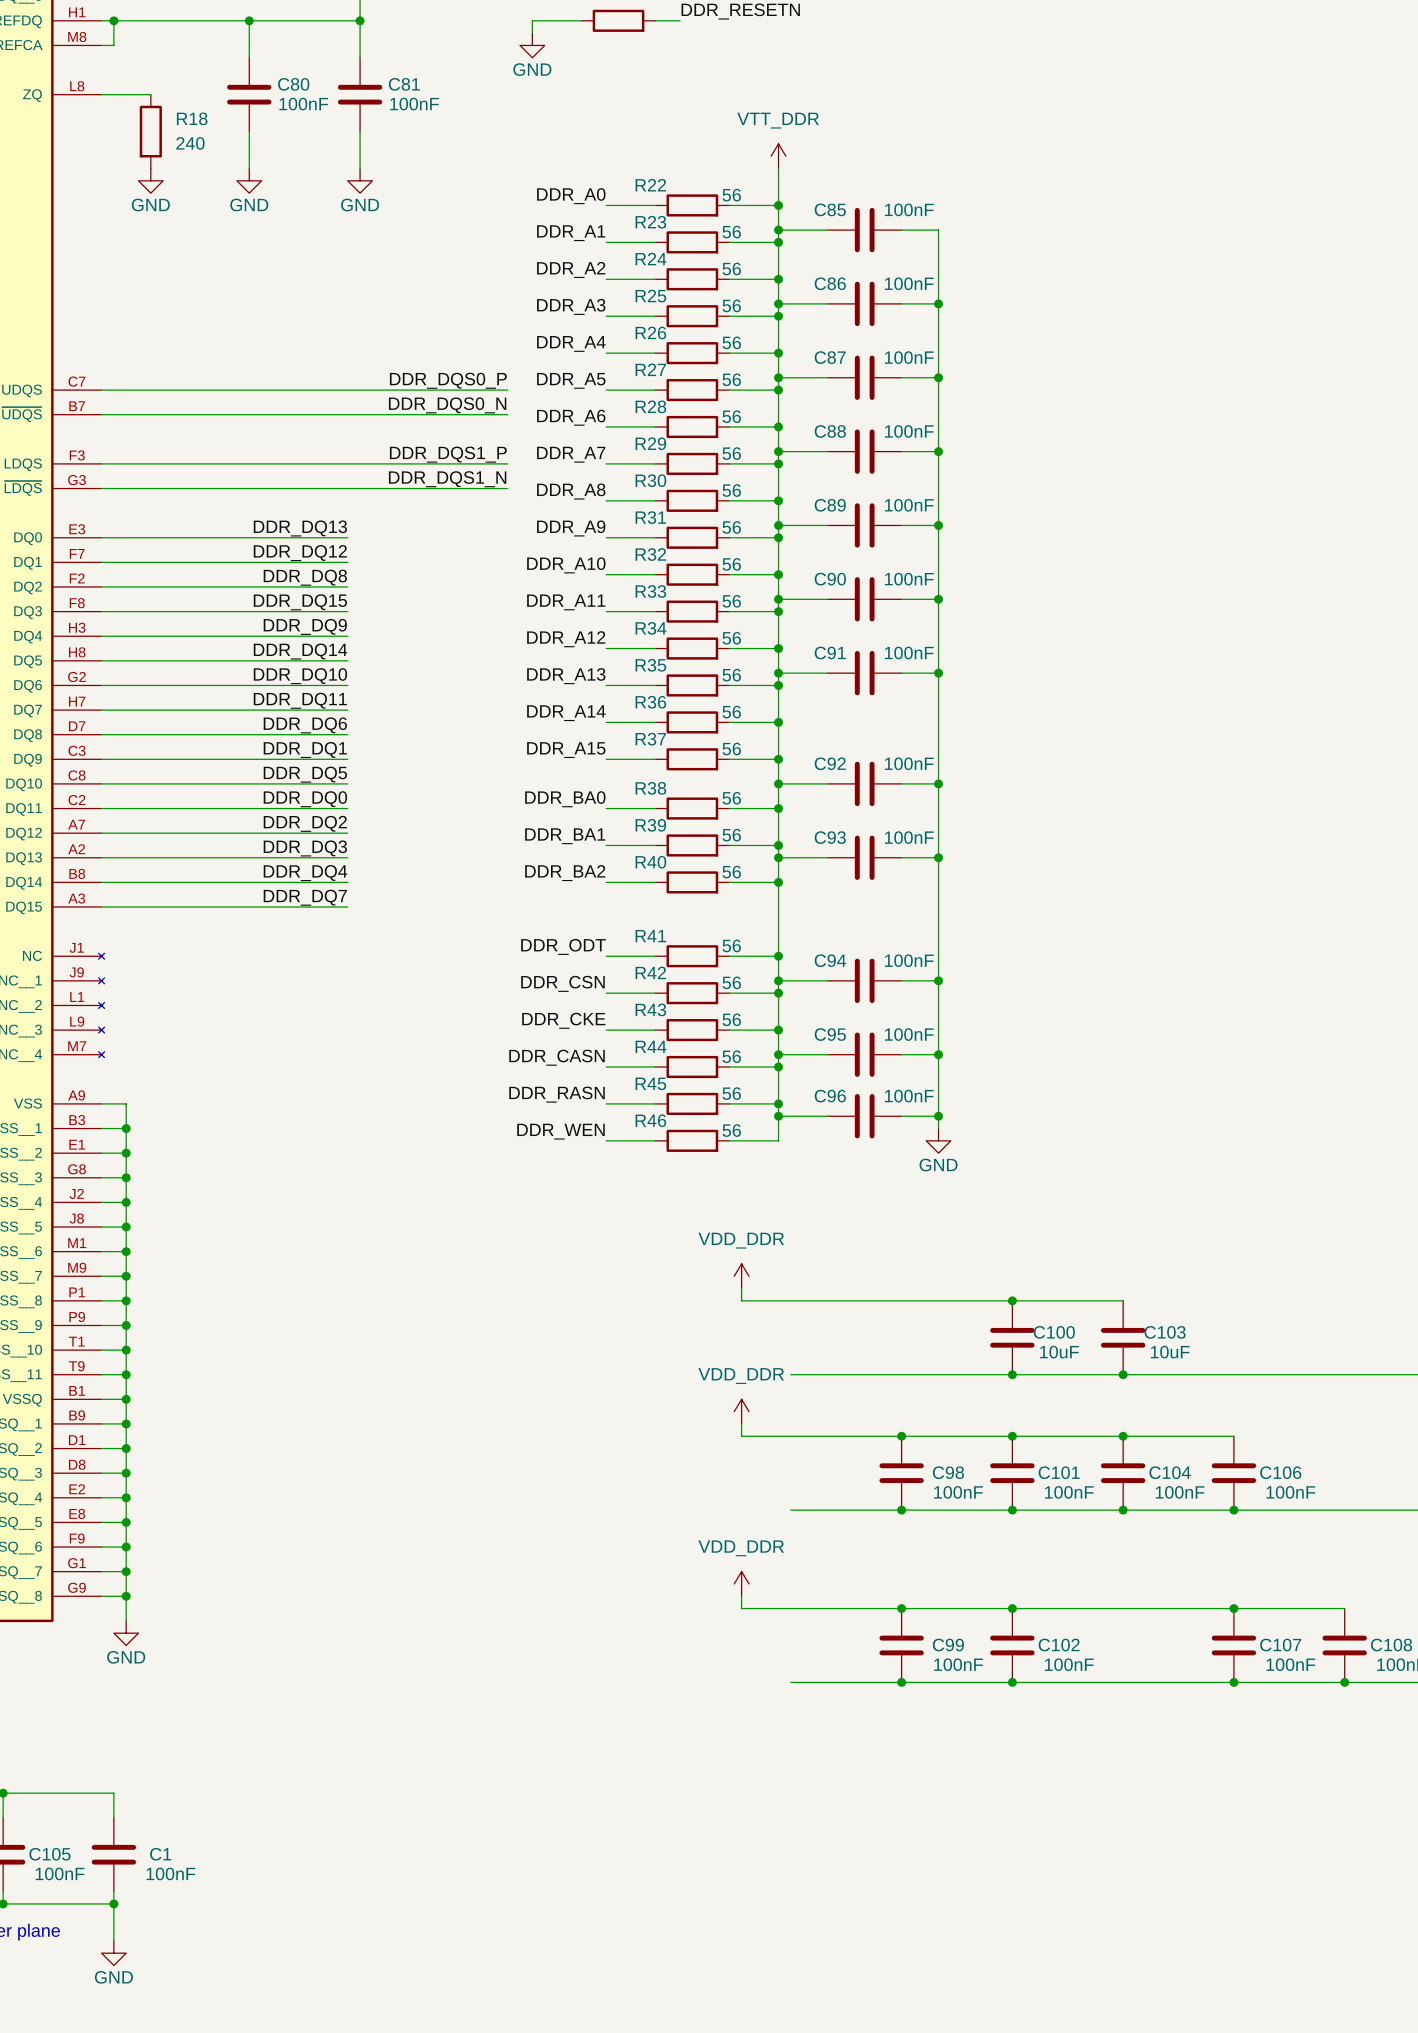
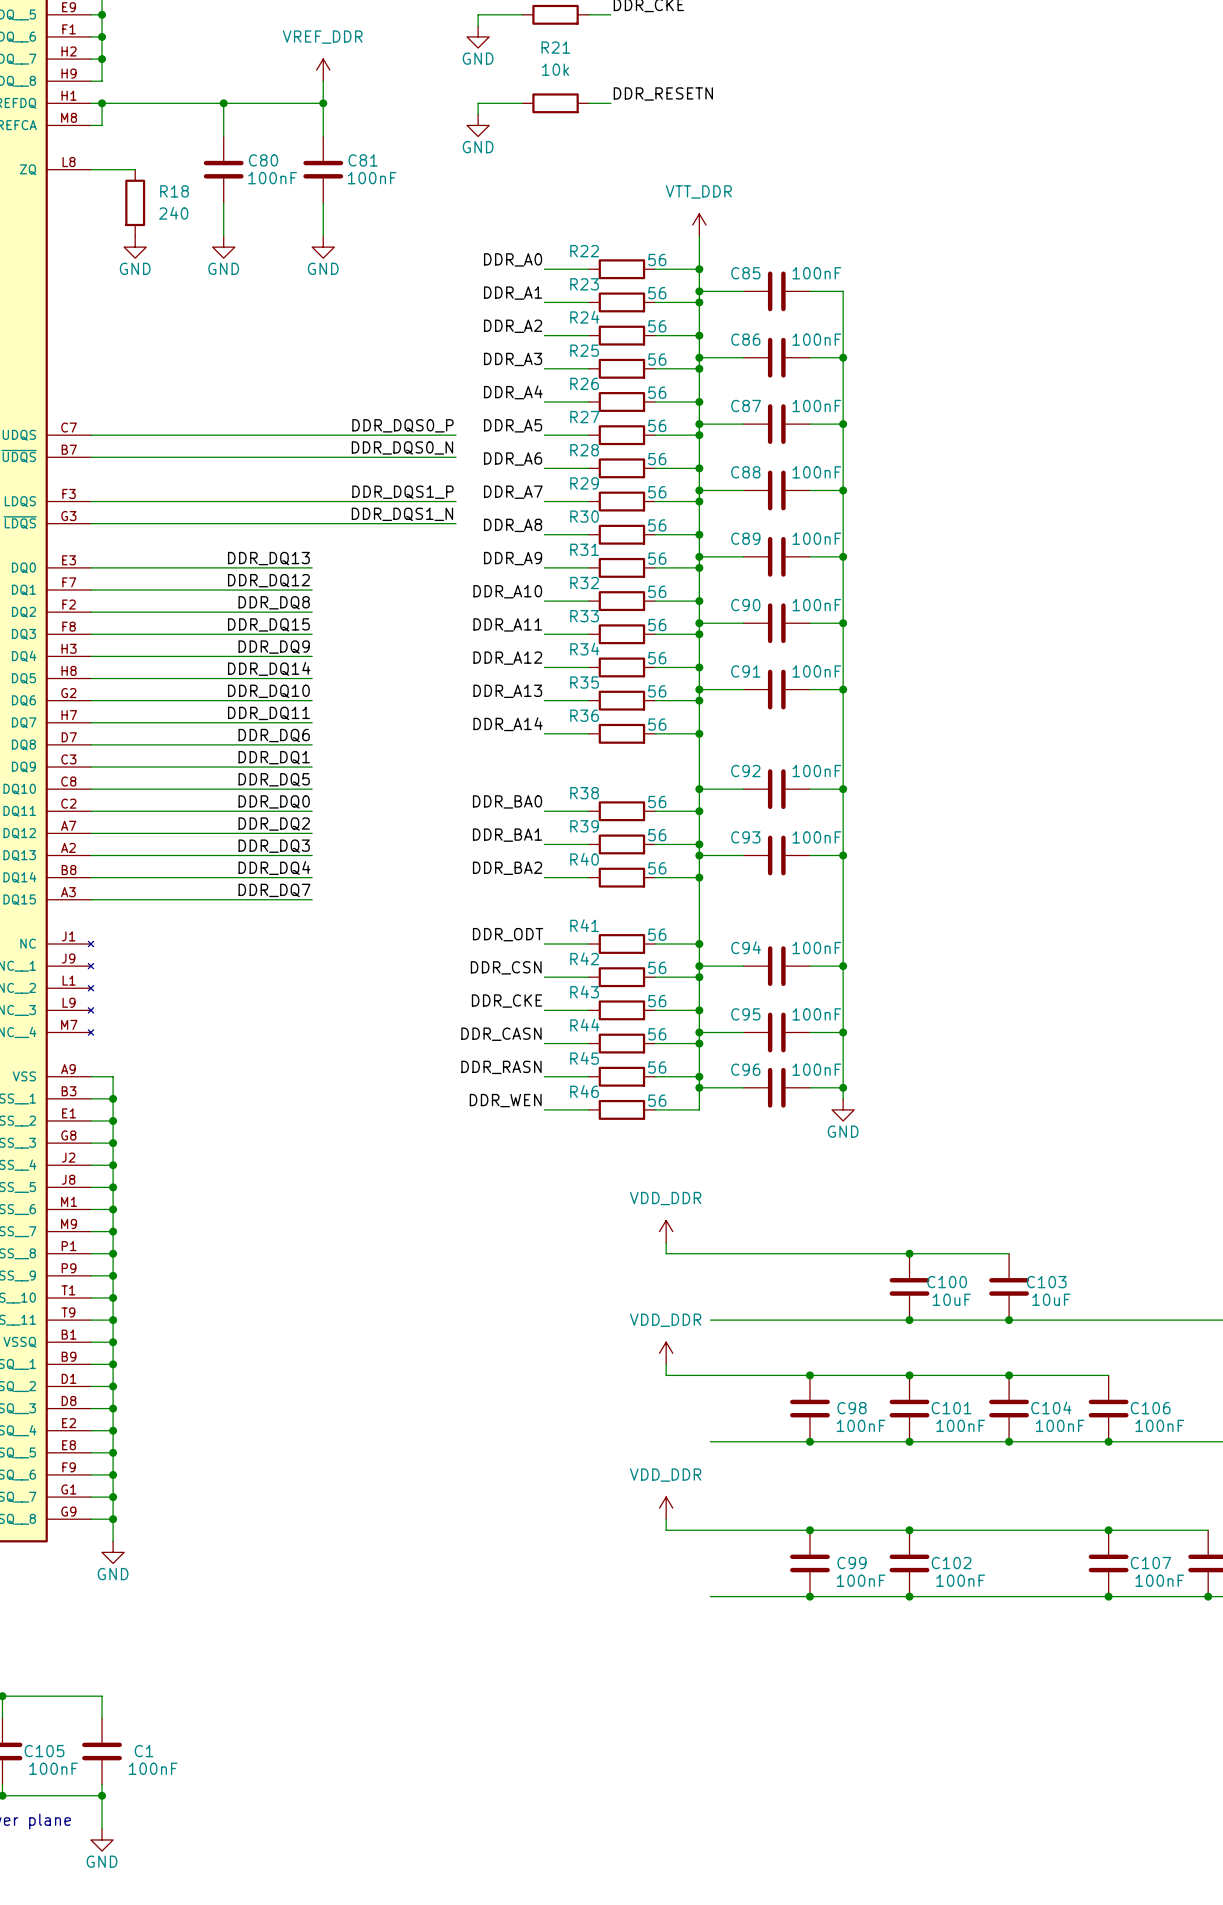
label: DDR_A15 (566, 750) -> none
wire: (606, 759) (655, 759) -> none
R37: 56 (692, 759) -> none
wire: (729, 759) (778, 759) -> none
junction: (778, 759) -> none

